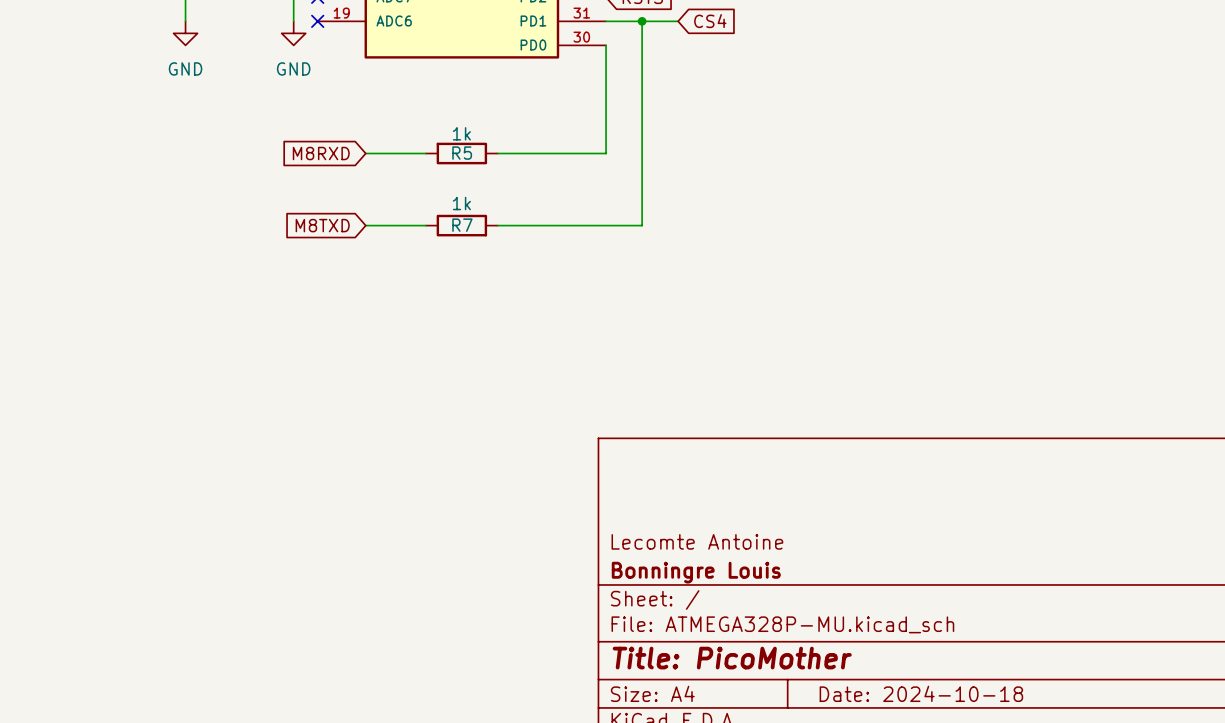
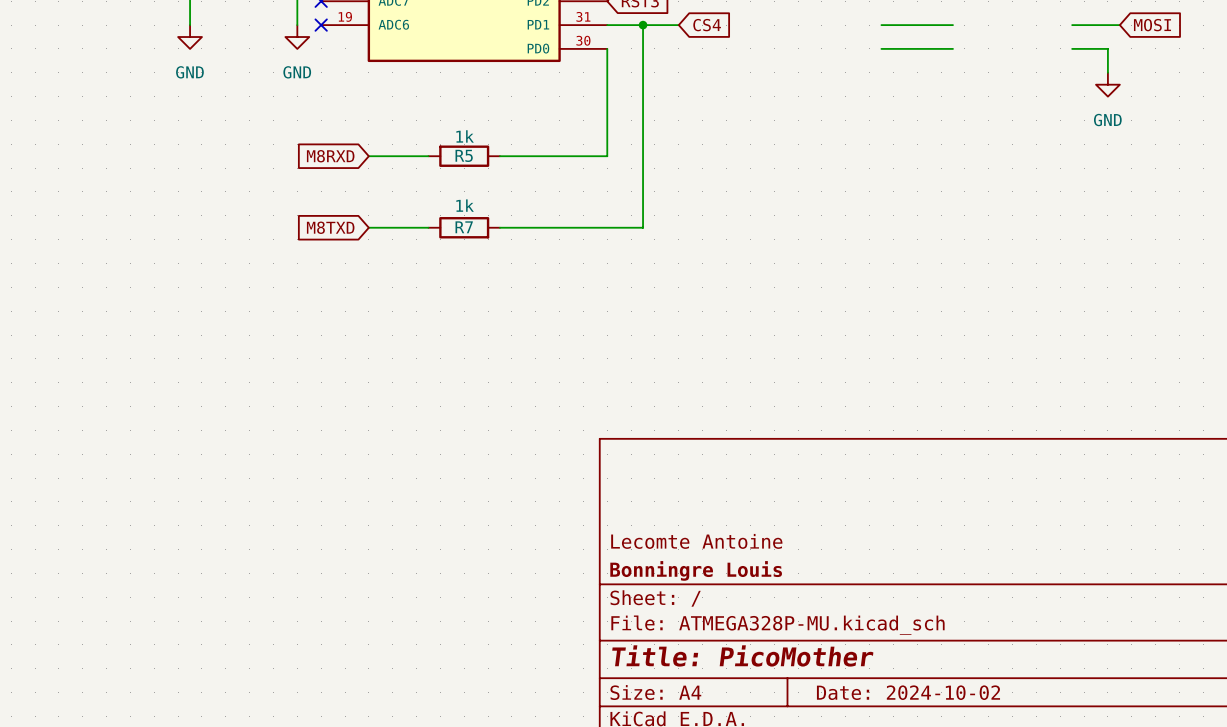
wire: none -> (881, 25) (952, 25)
wire: none -> (1072, 25) (1119, 25)
global label: none -> MOSI (1152, 25)
wire: none -> (881, 48) (952, 48)
wire: none -> (1072, 48) (1107, 48) (1107, 72)
power symbol: none -> GND (1107, 84)
title block: Date: 2024-10-18 (921, 693) -> Date: 2024-10-02 (908, 692)

